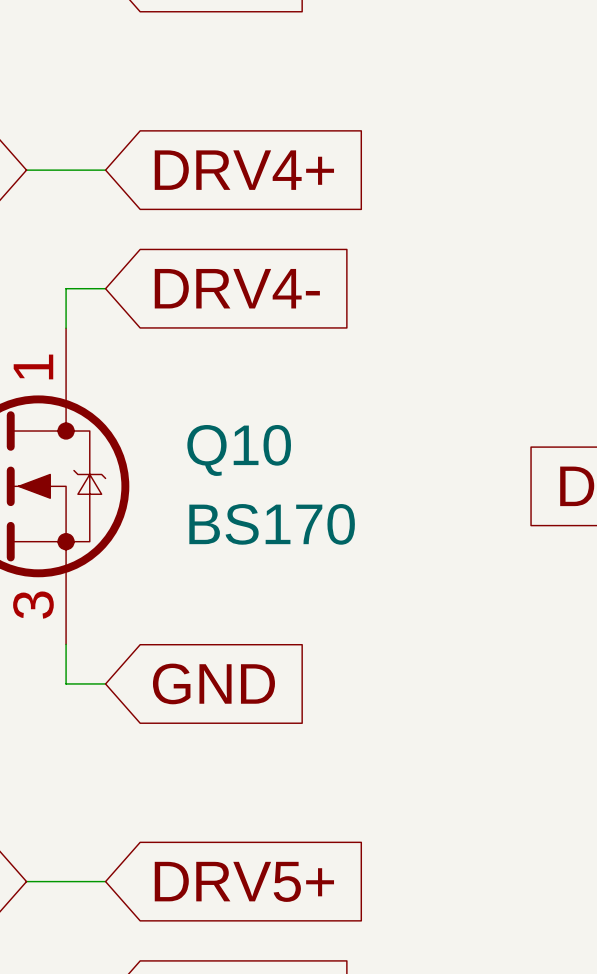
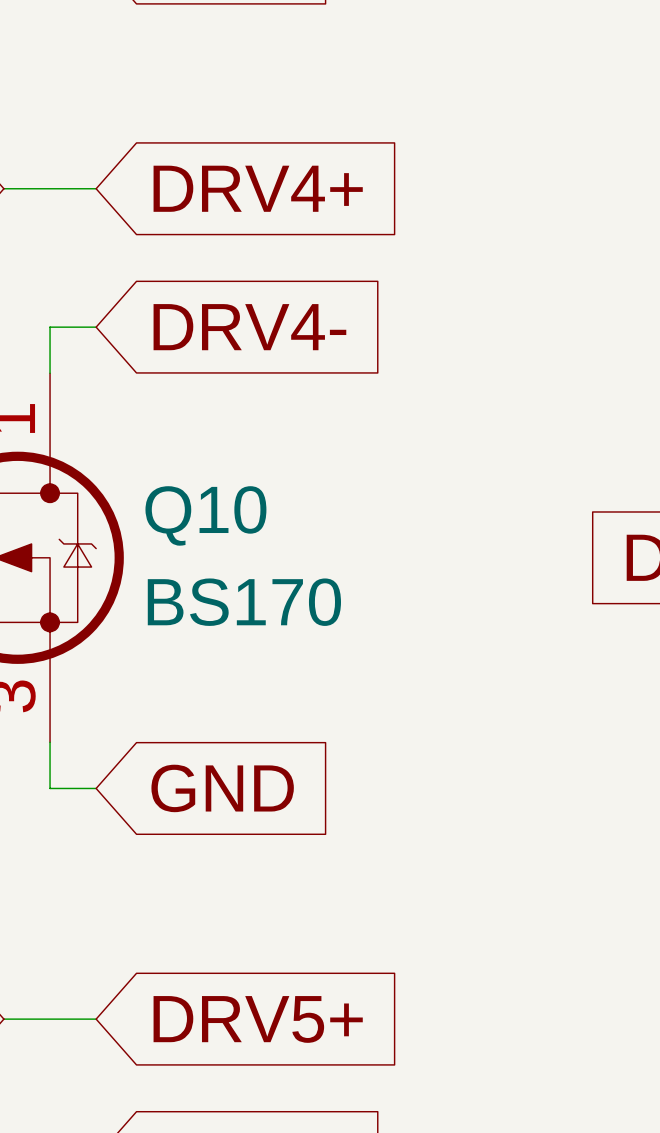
Q10 name position: Q10 (239, 450) -> Q10 (205, 515)
Q10 value position: BS170 (272, 524) -> BS170 (244, 602)

